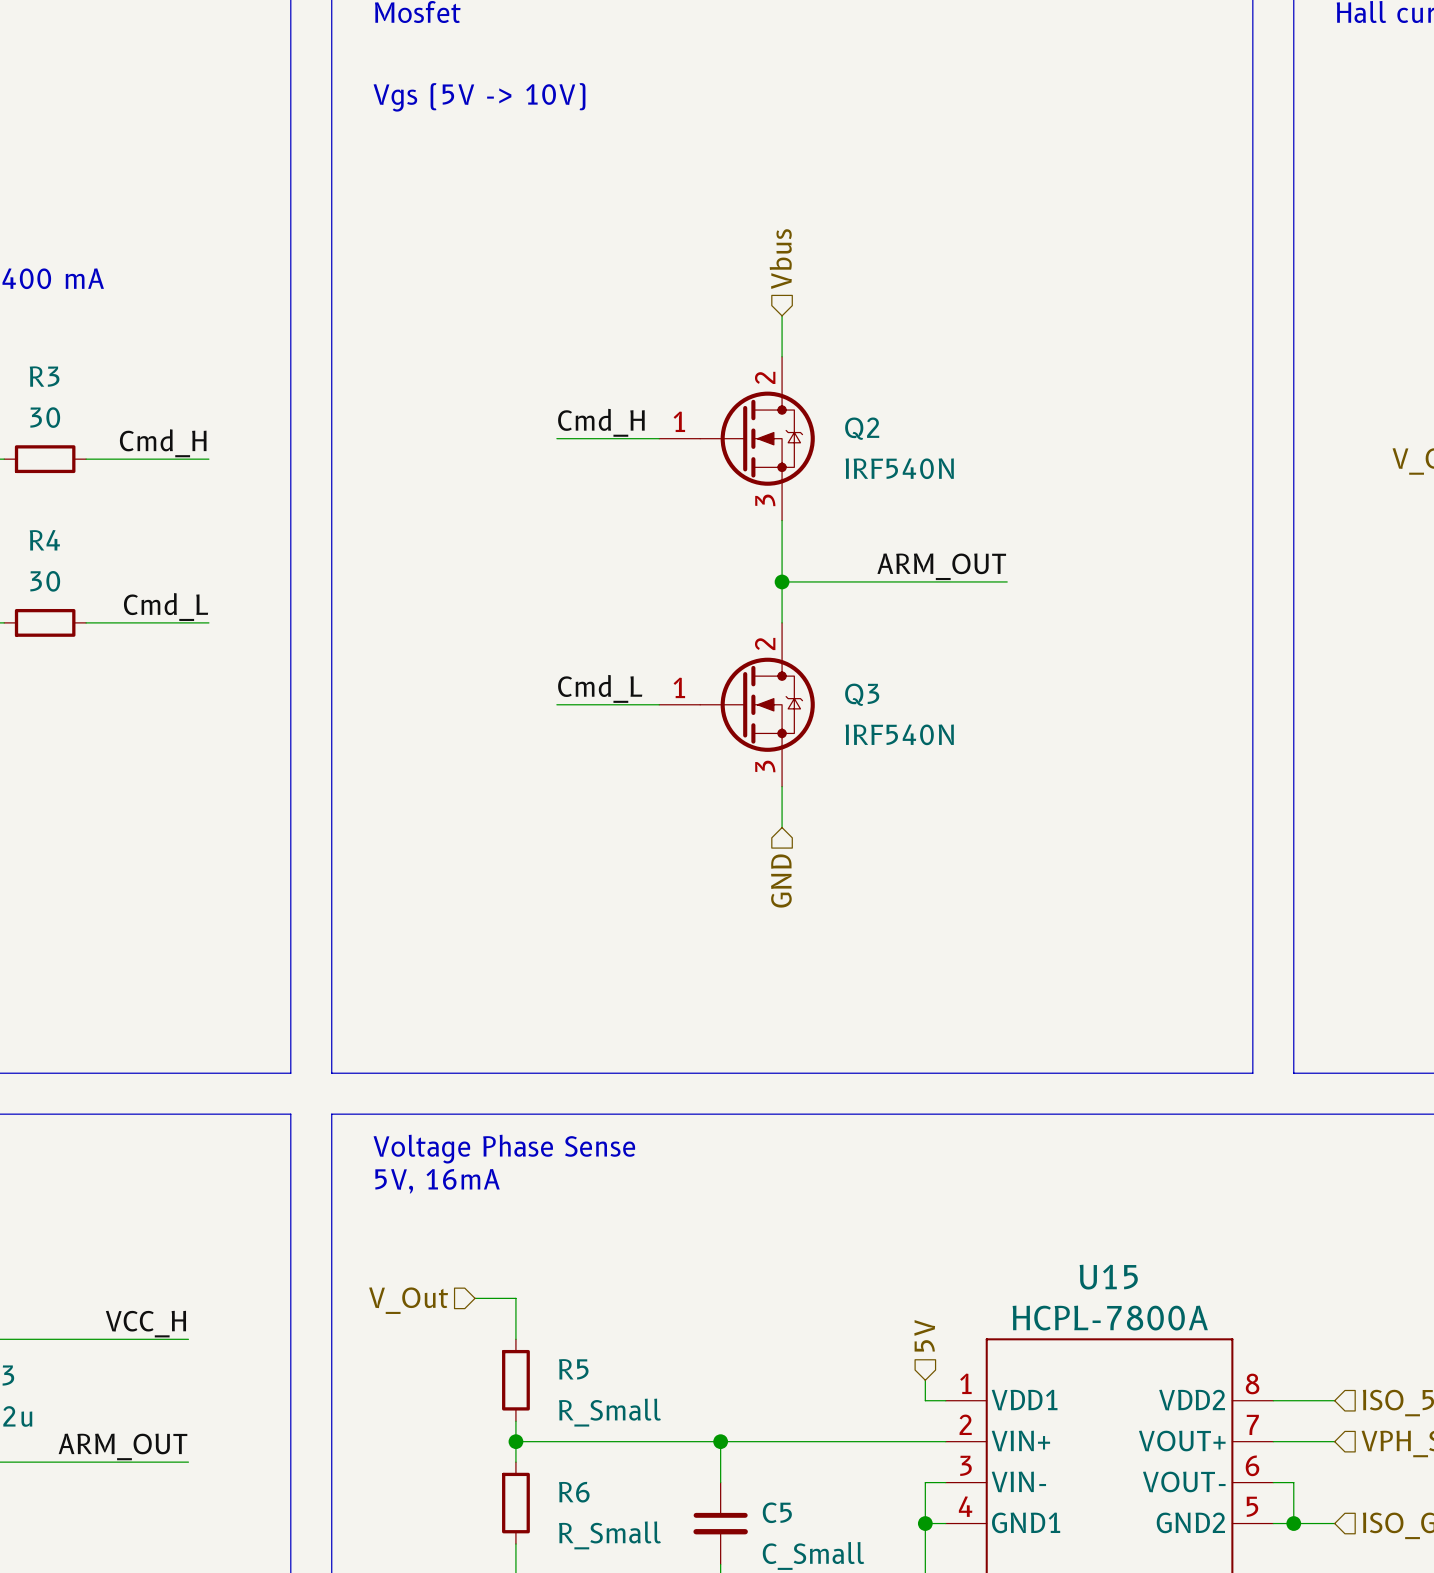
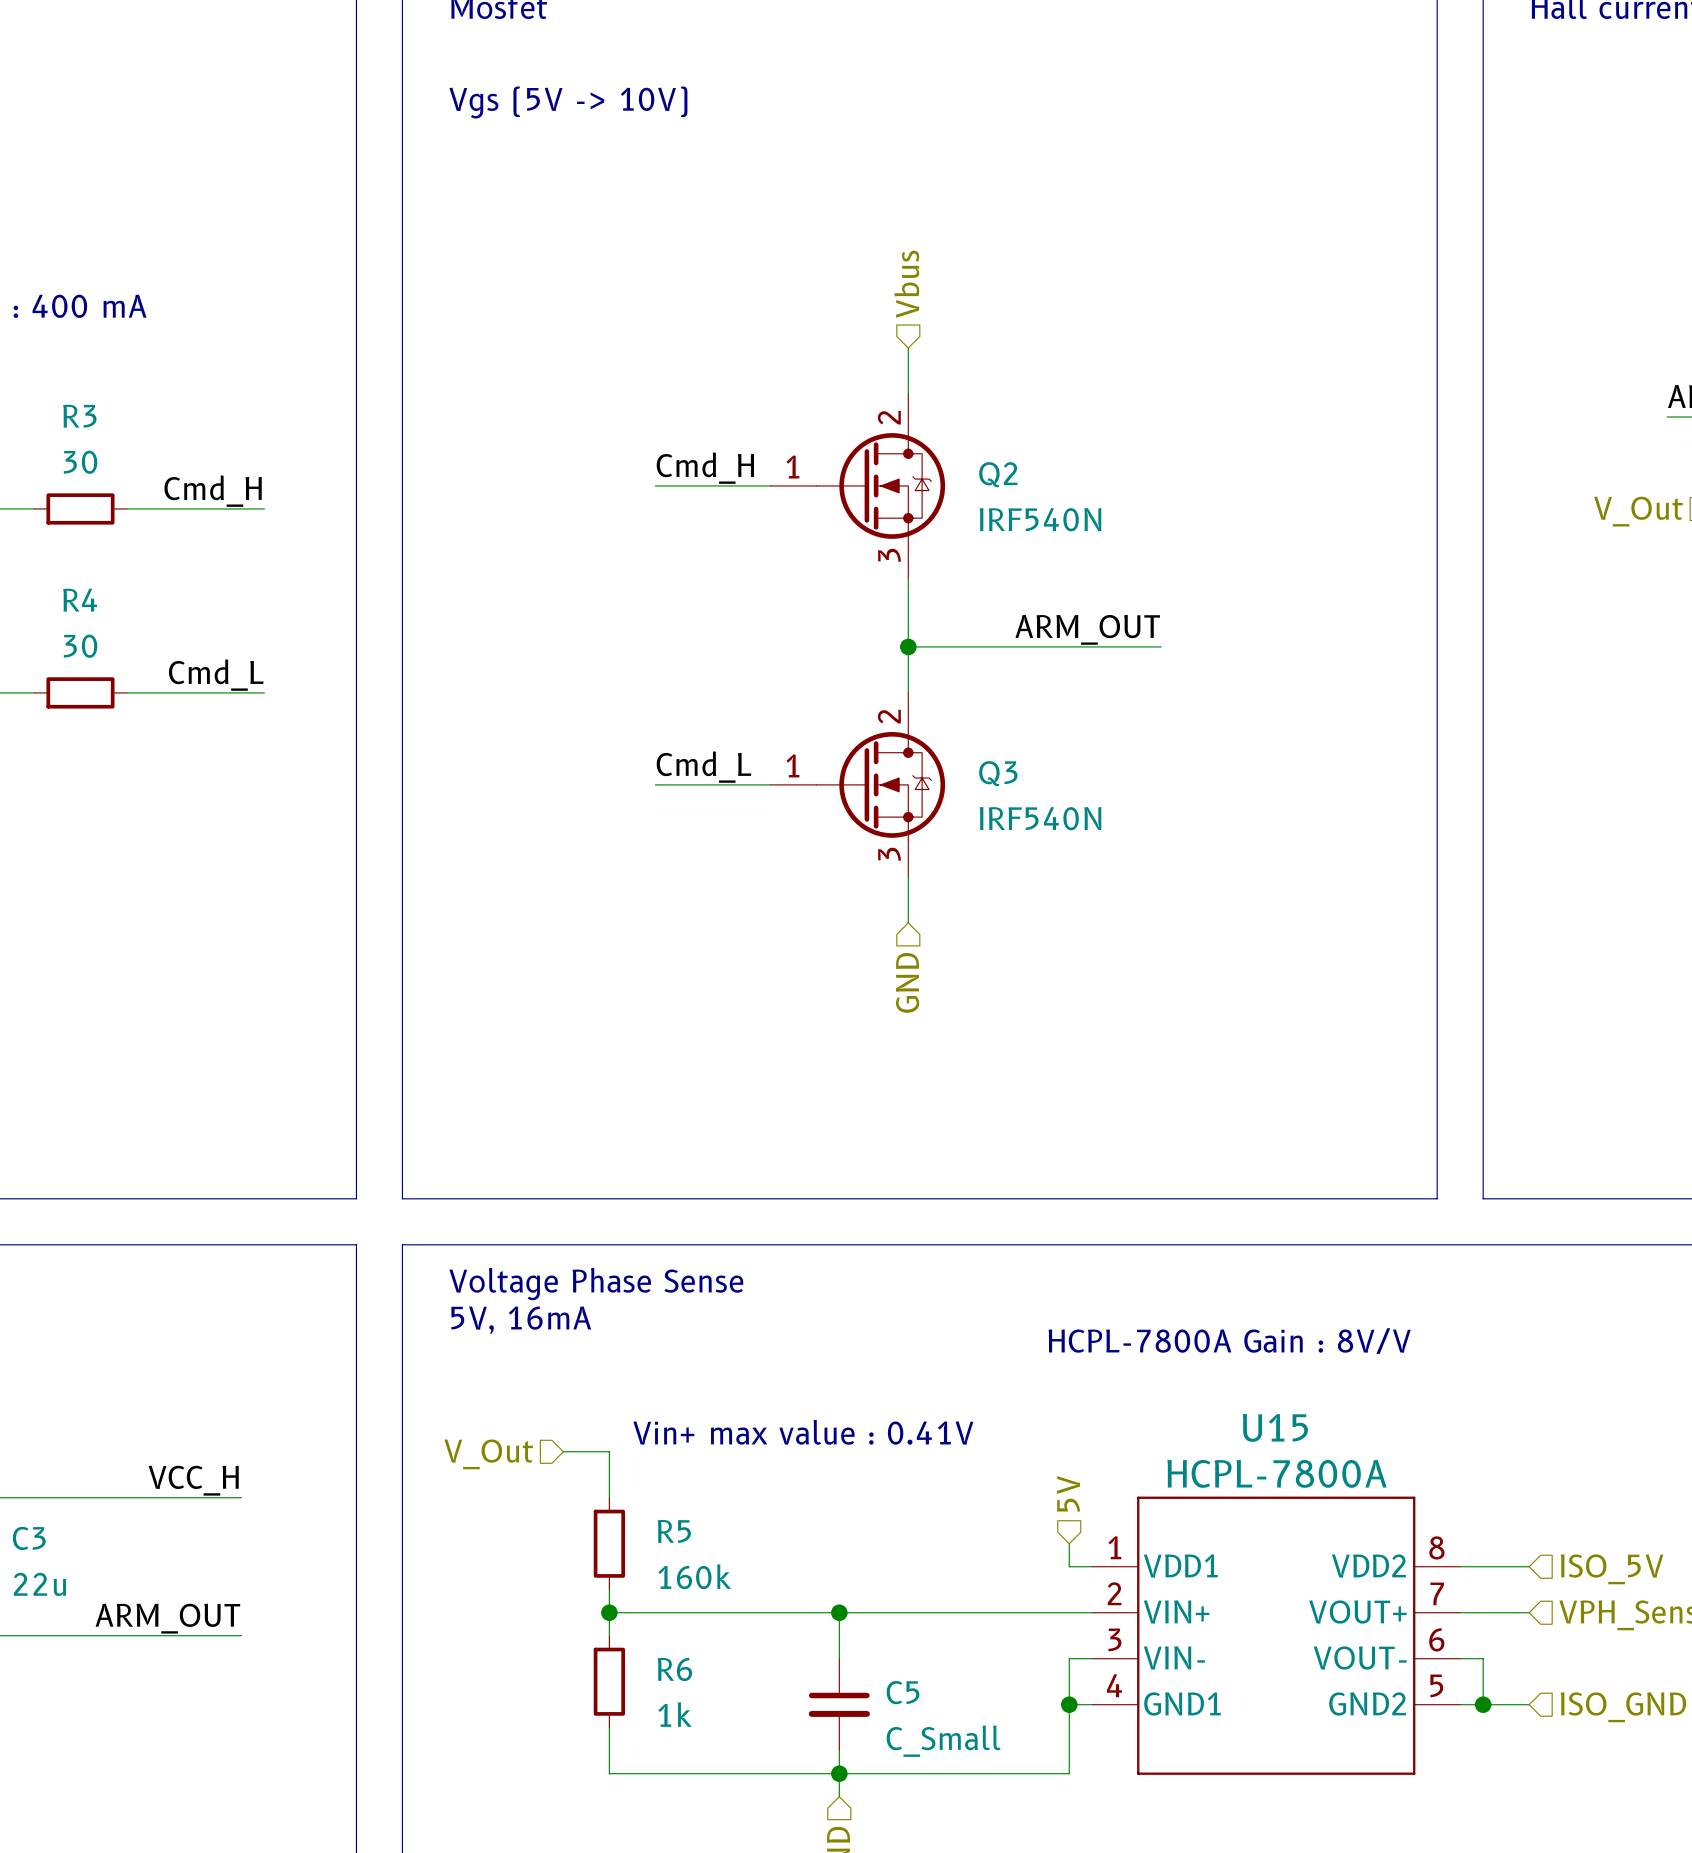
text: none -> HCPL-7800A Gain : 8V/V (1229, 1341)
text: none -> Vin+ max value : 0.41V (803, 1432)
R5 value: R_Small (609, 1412) -> 160k (694, 1576)
R6 value: R_Small (609, 1535) -> 1k (675, 1714)

